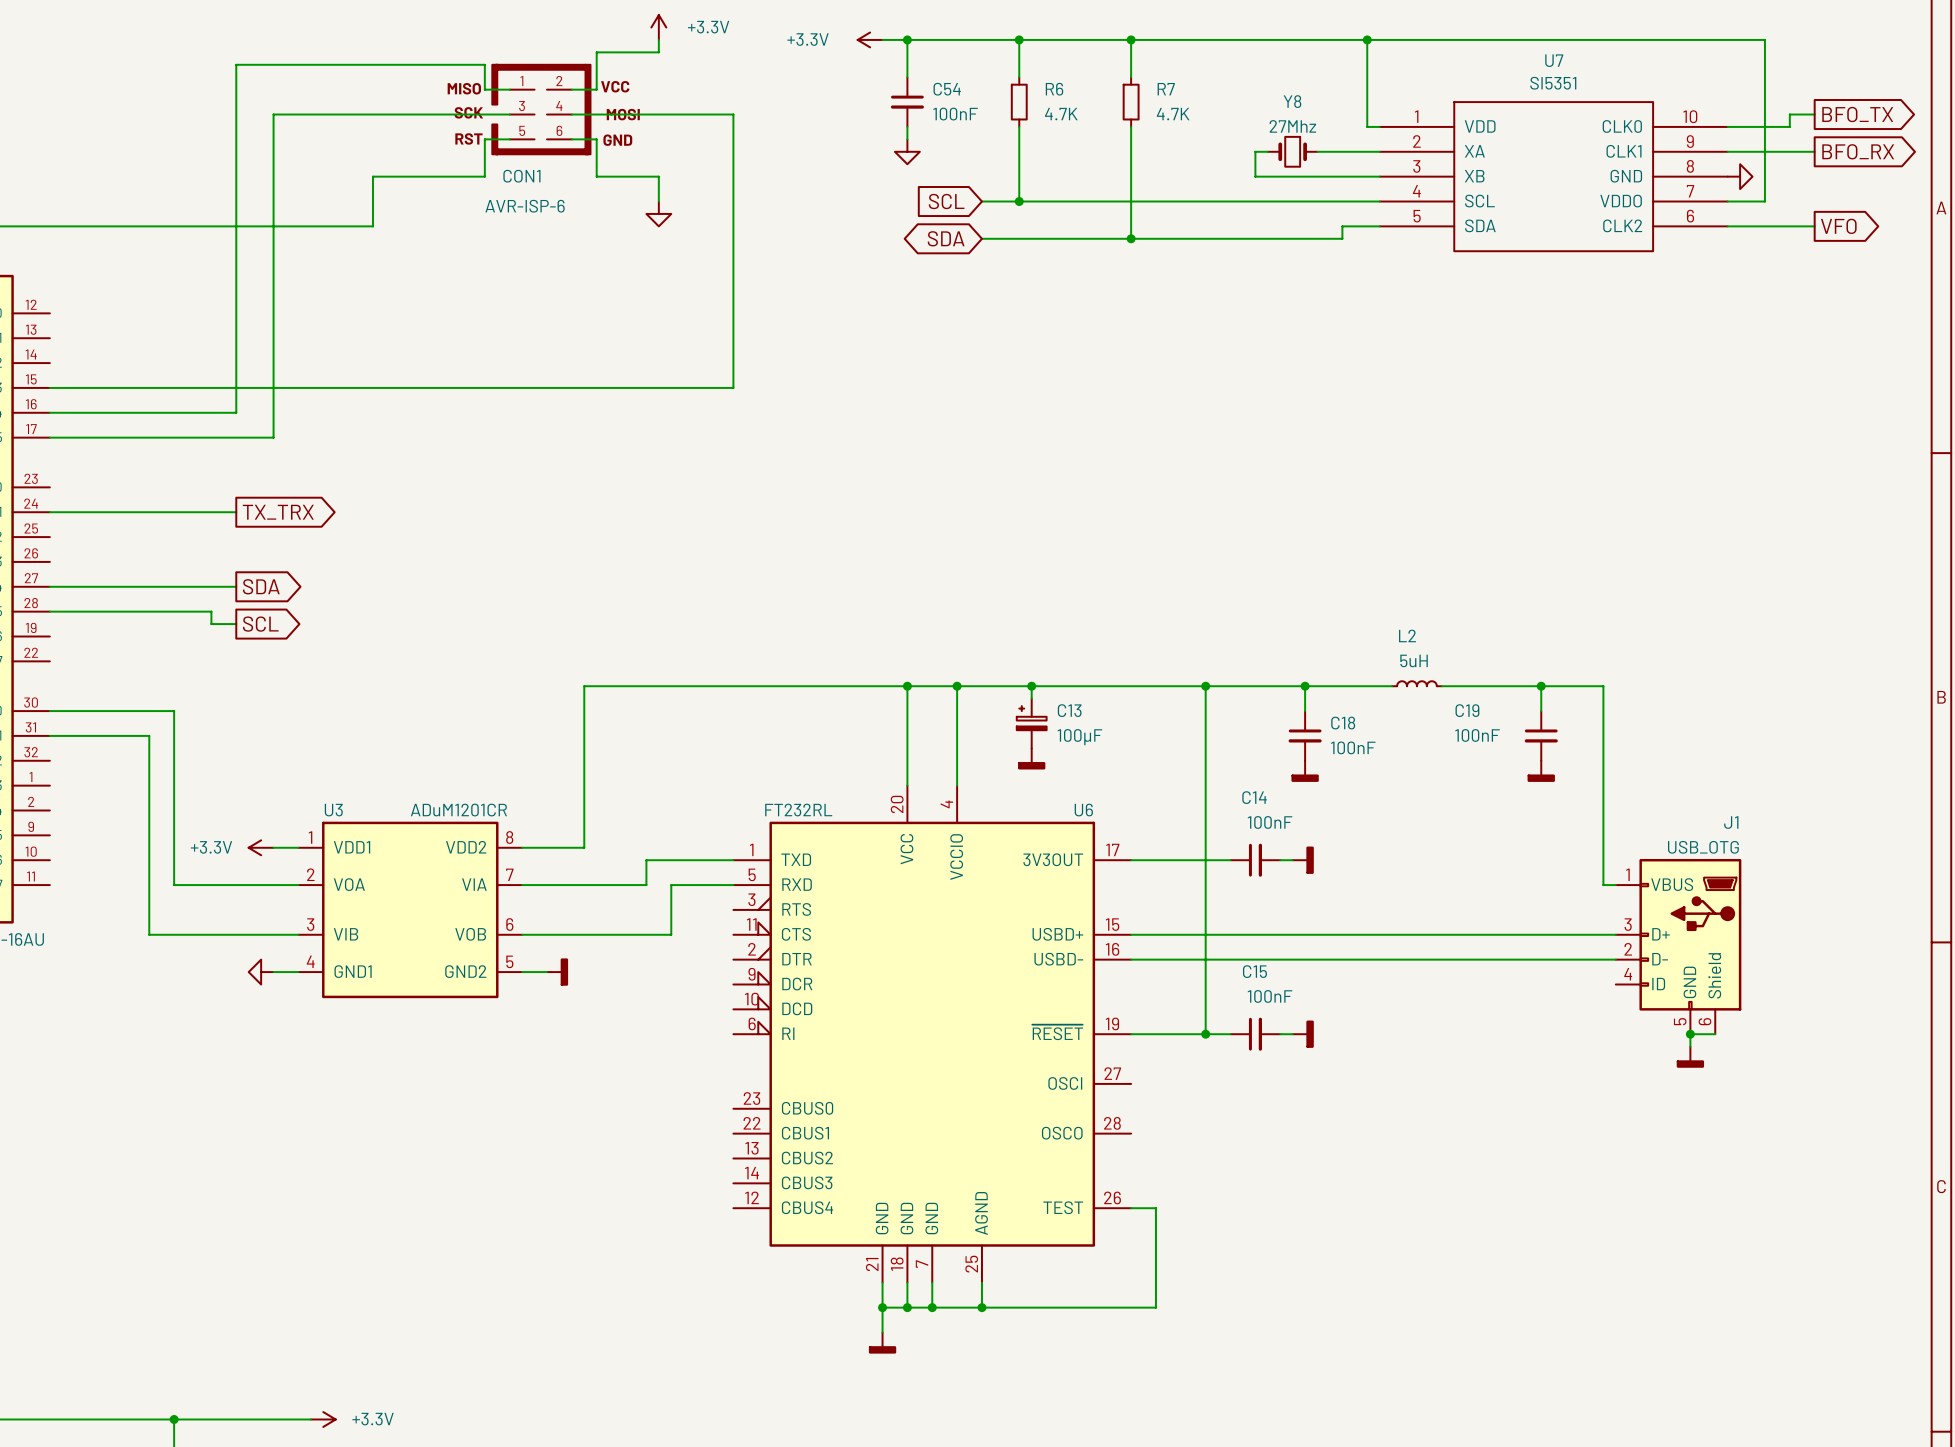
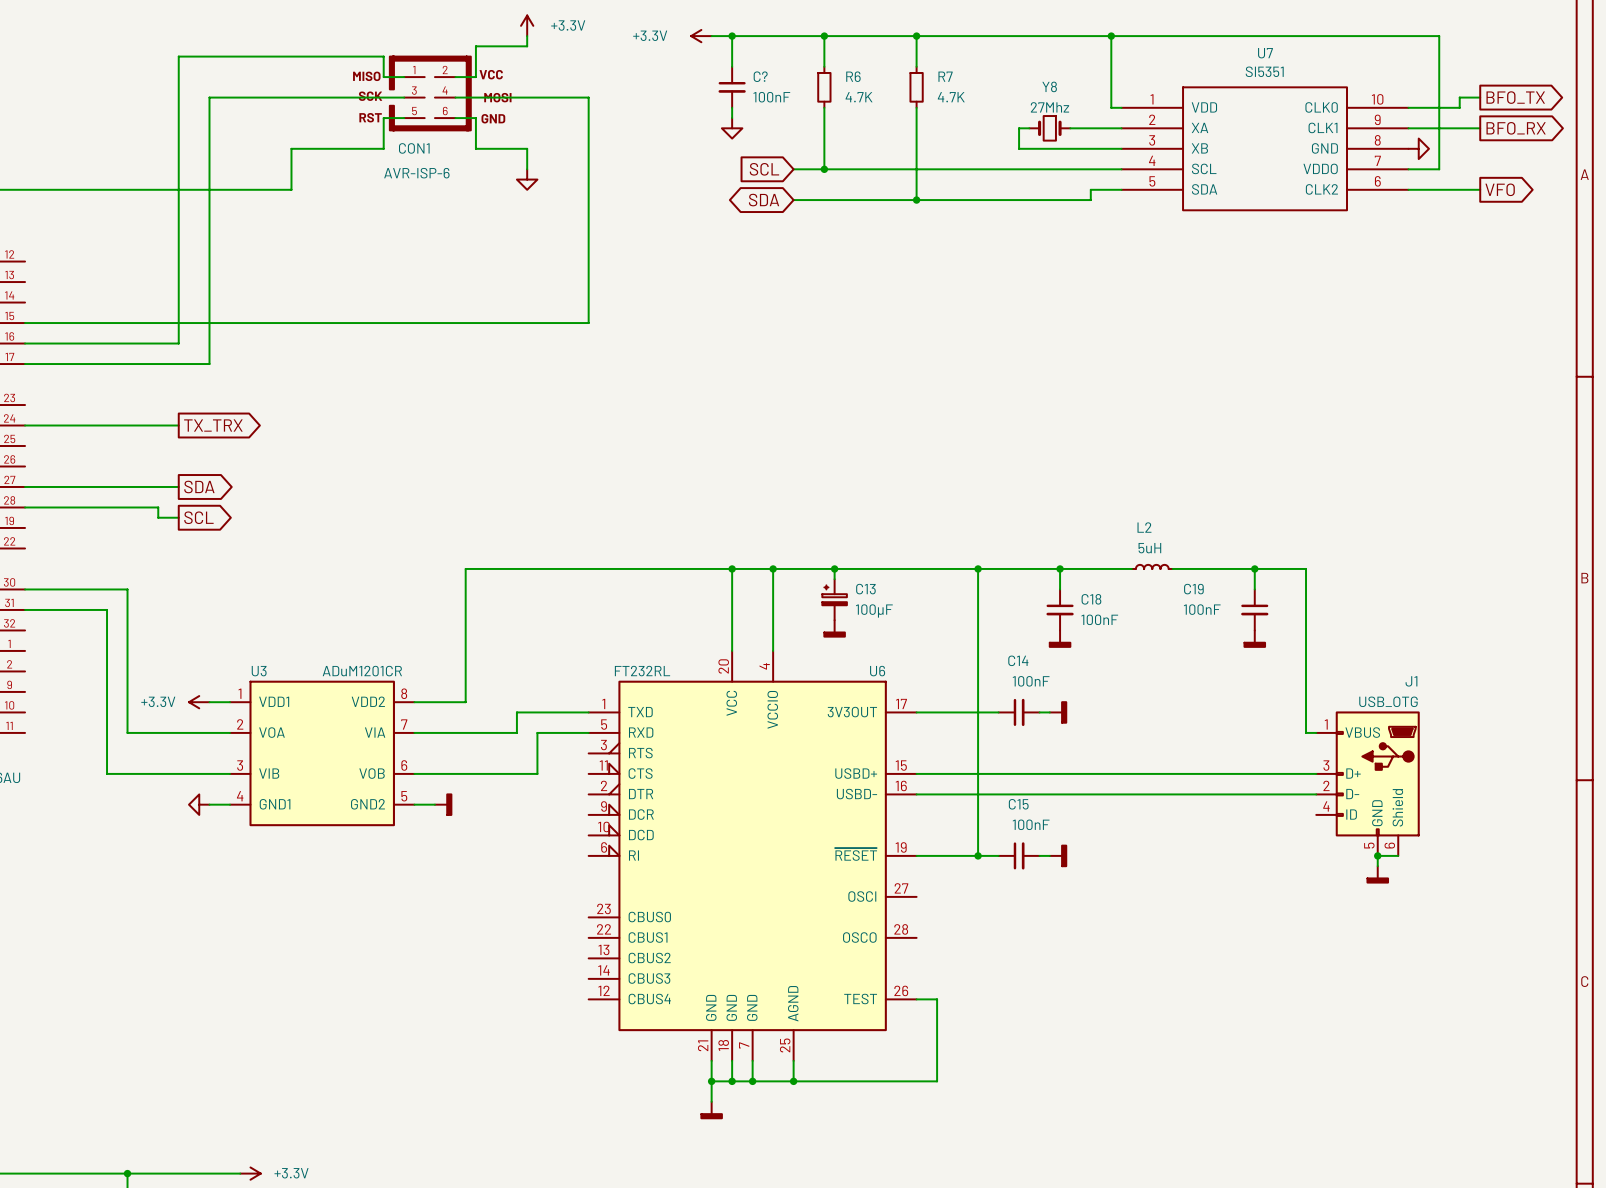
C54 name: C54 (947, 89) -> C? (760, 76)

